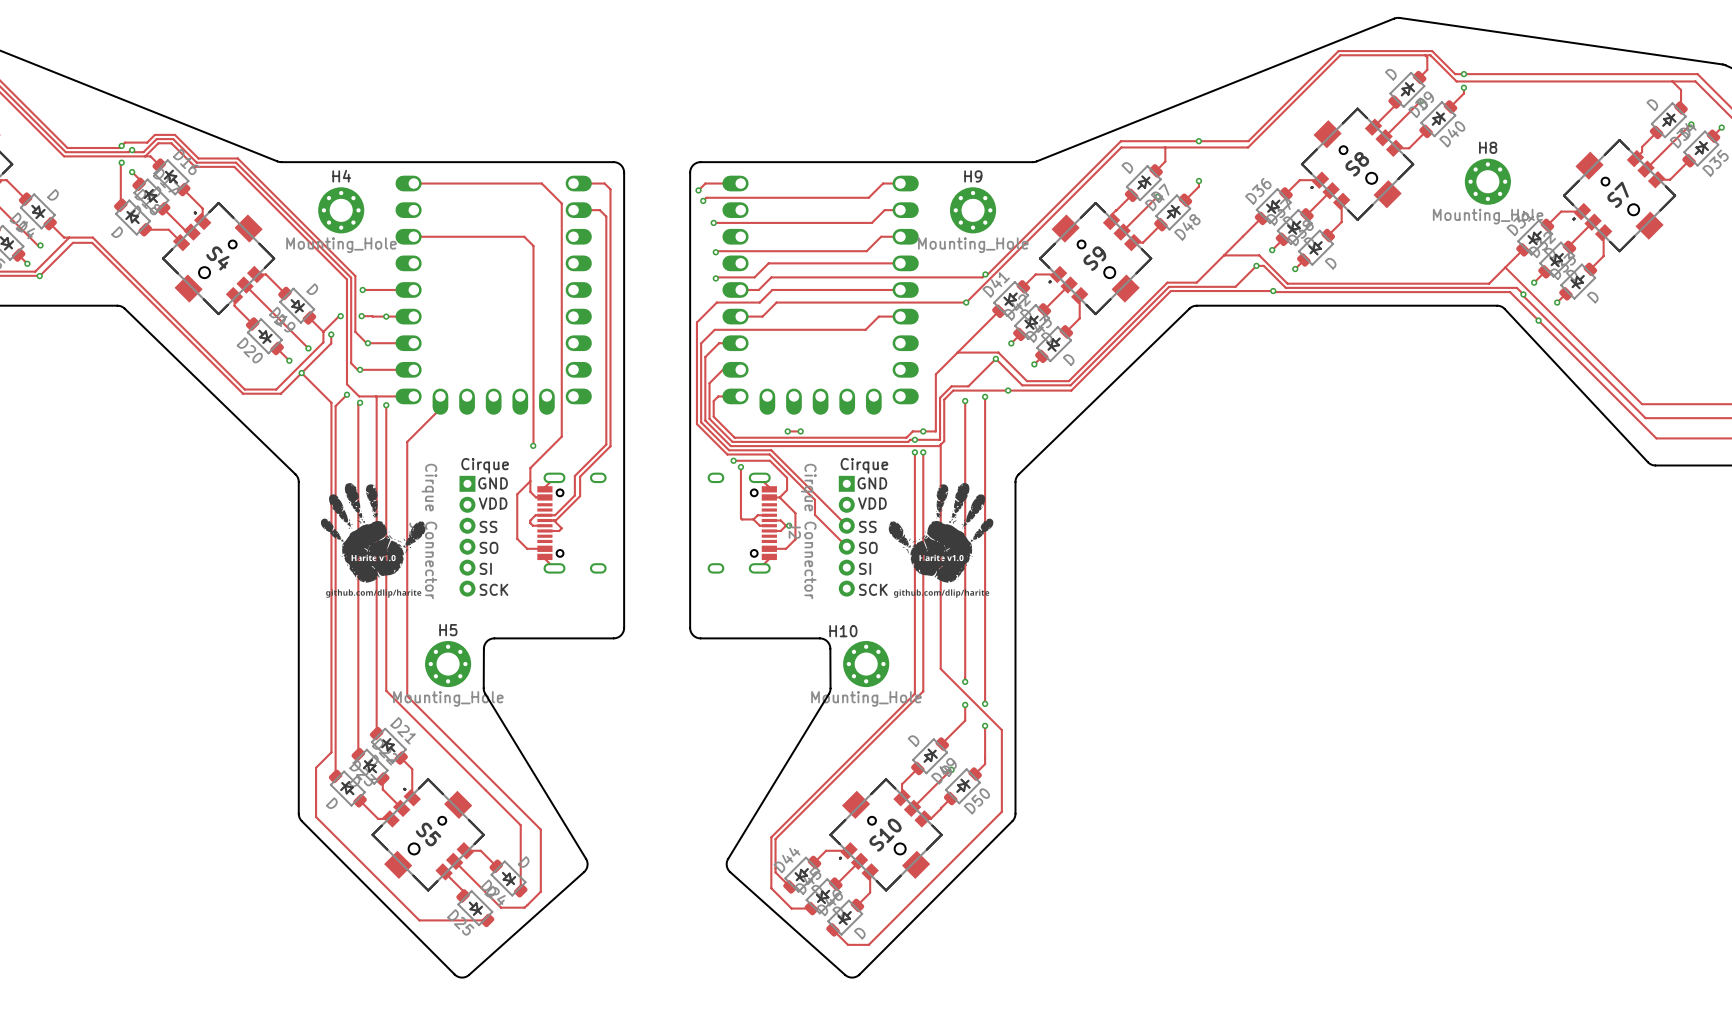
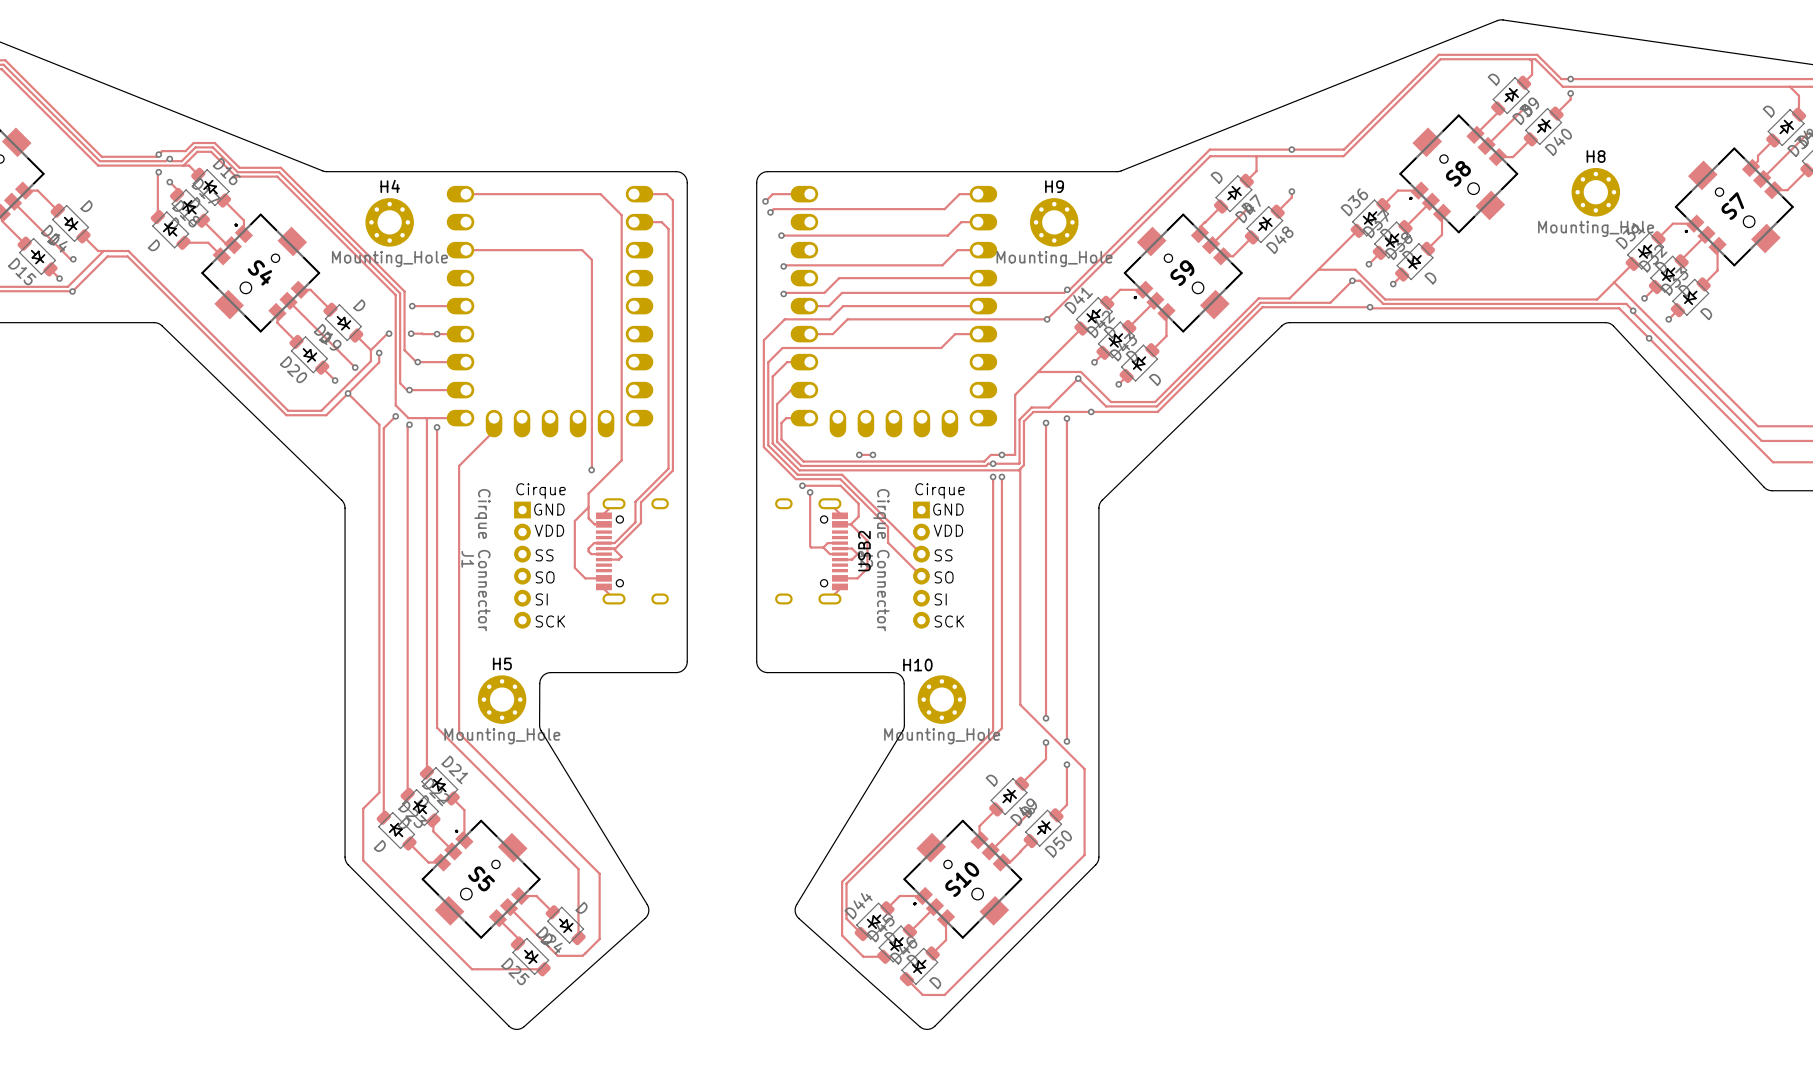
drawing: [320, 483, 426, 598] -> none
drawing: [888, 483, 994, 598] -> none
USB2 name: none -> USB2 (864, 551)

